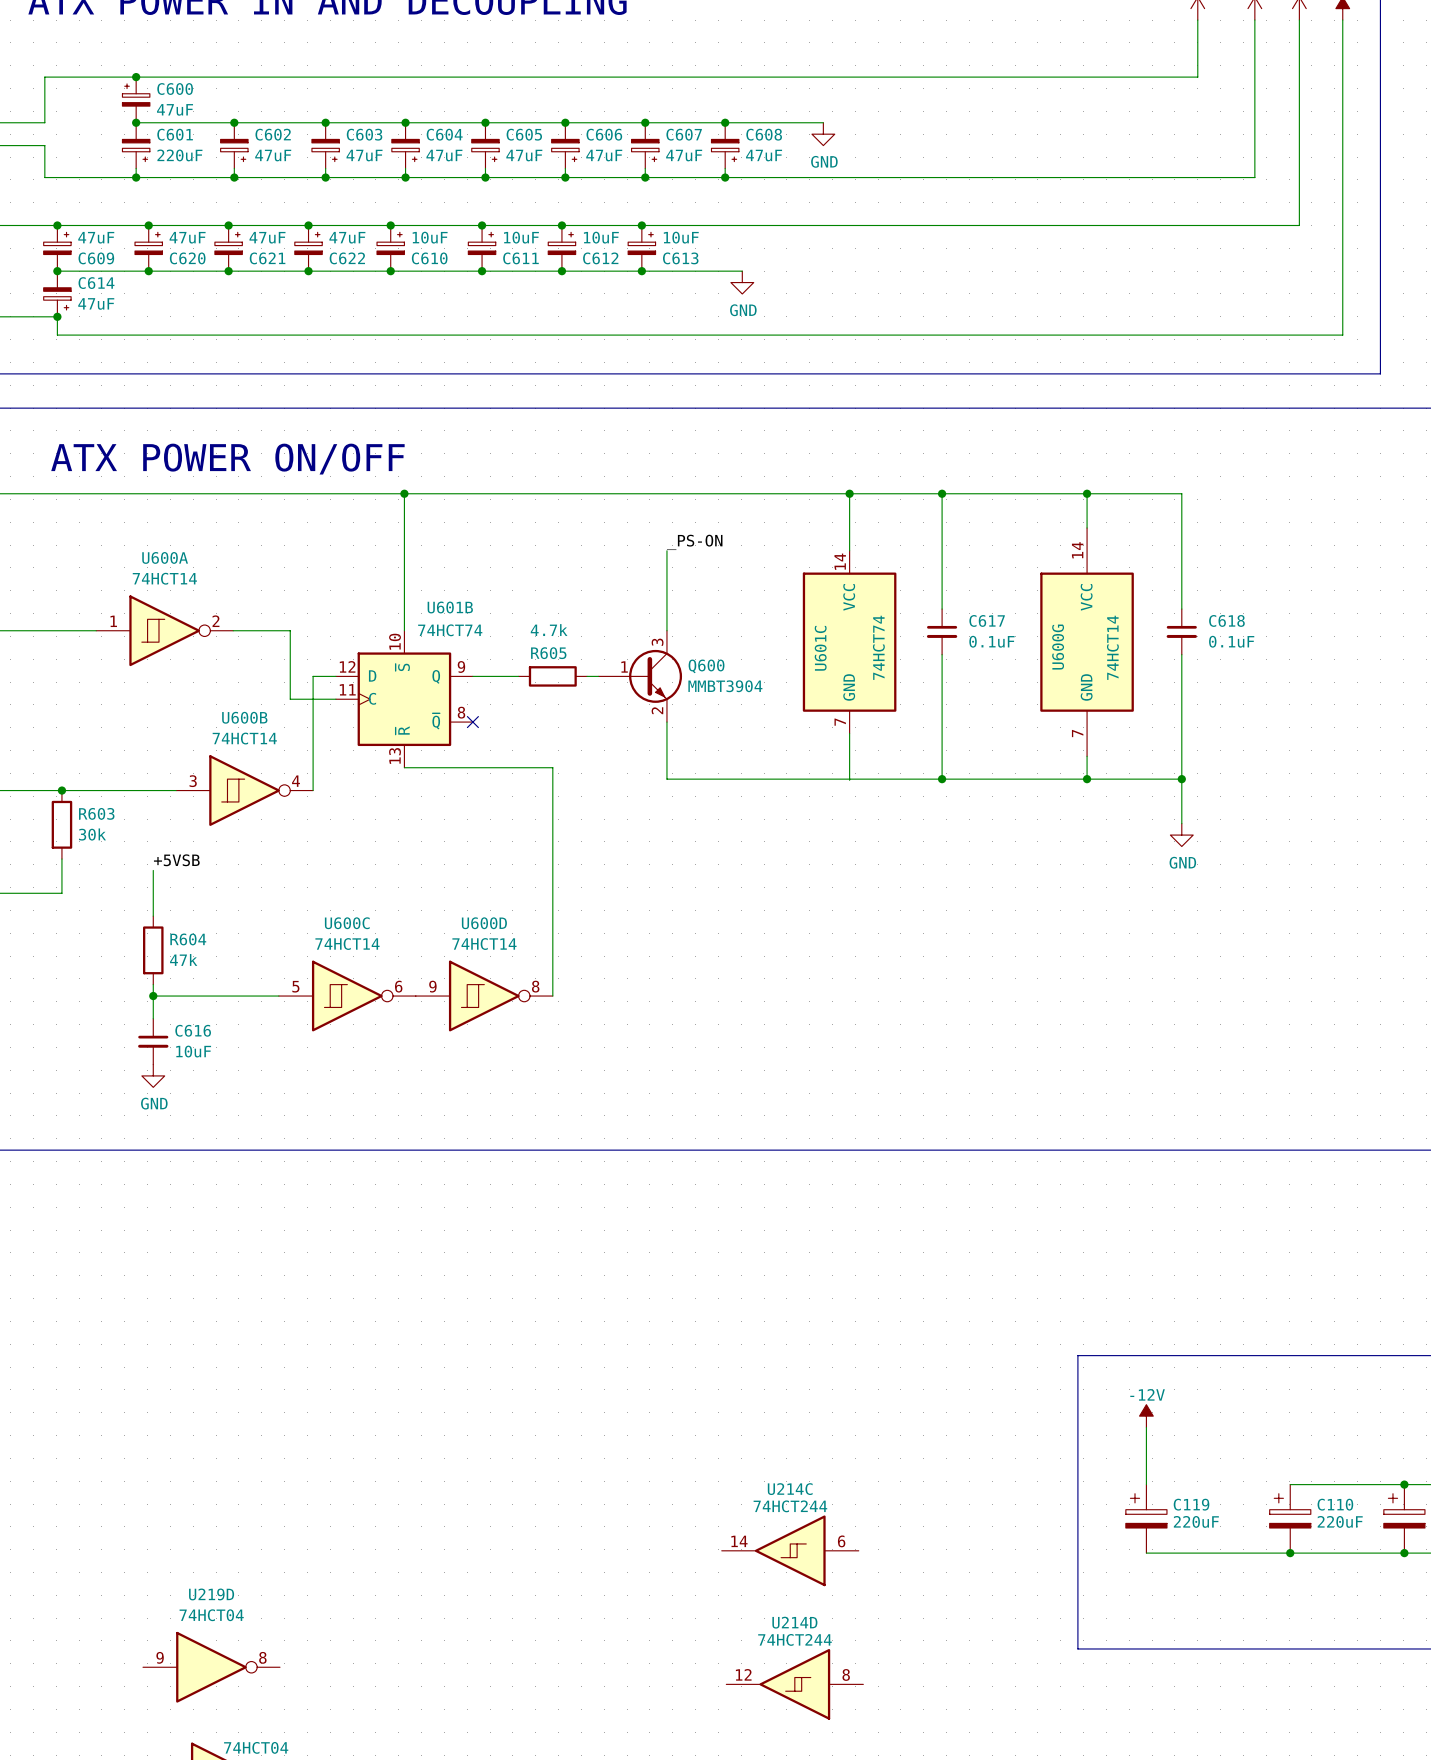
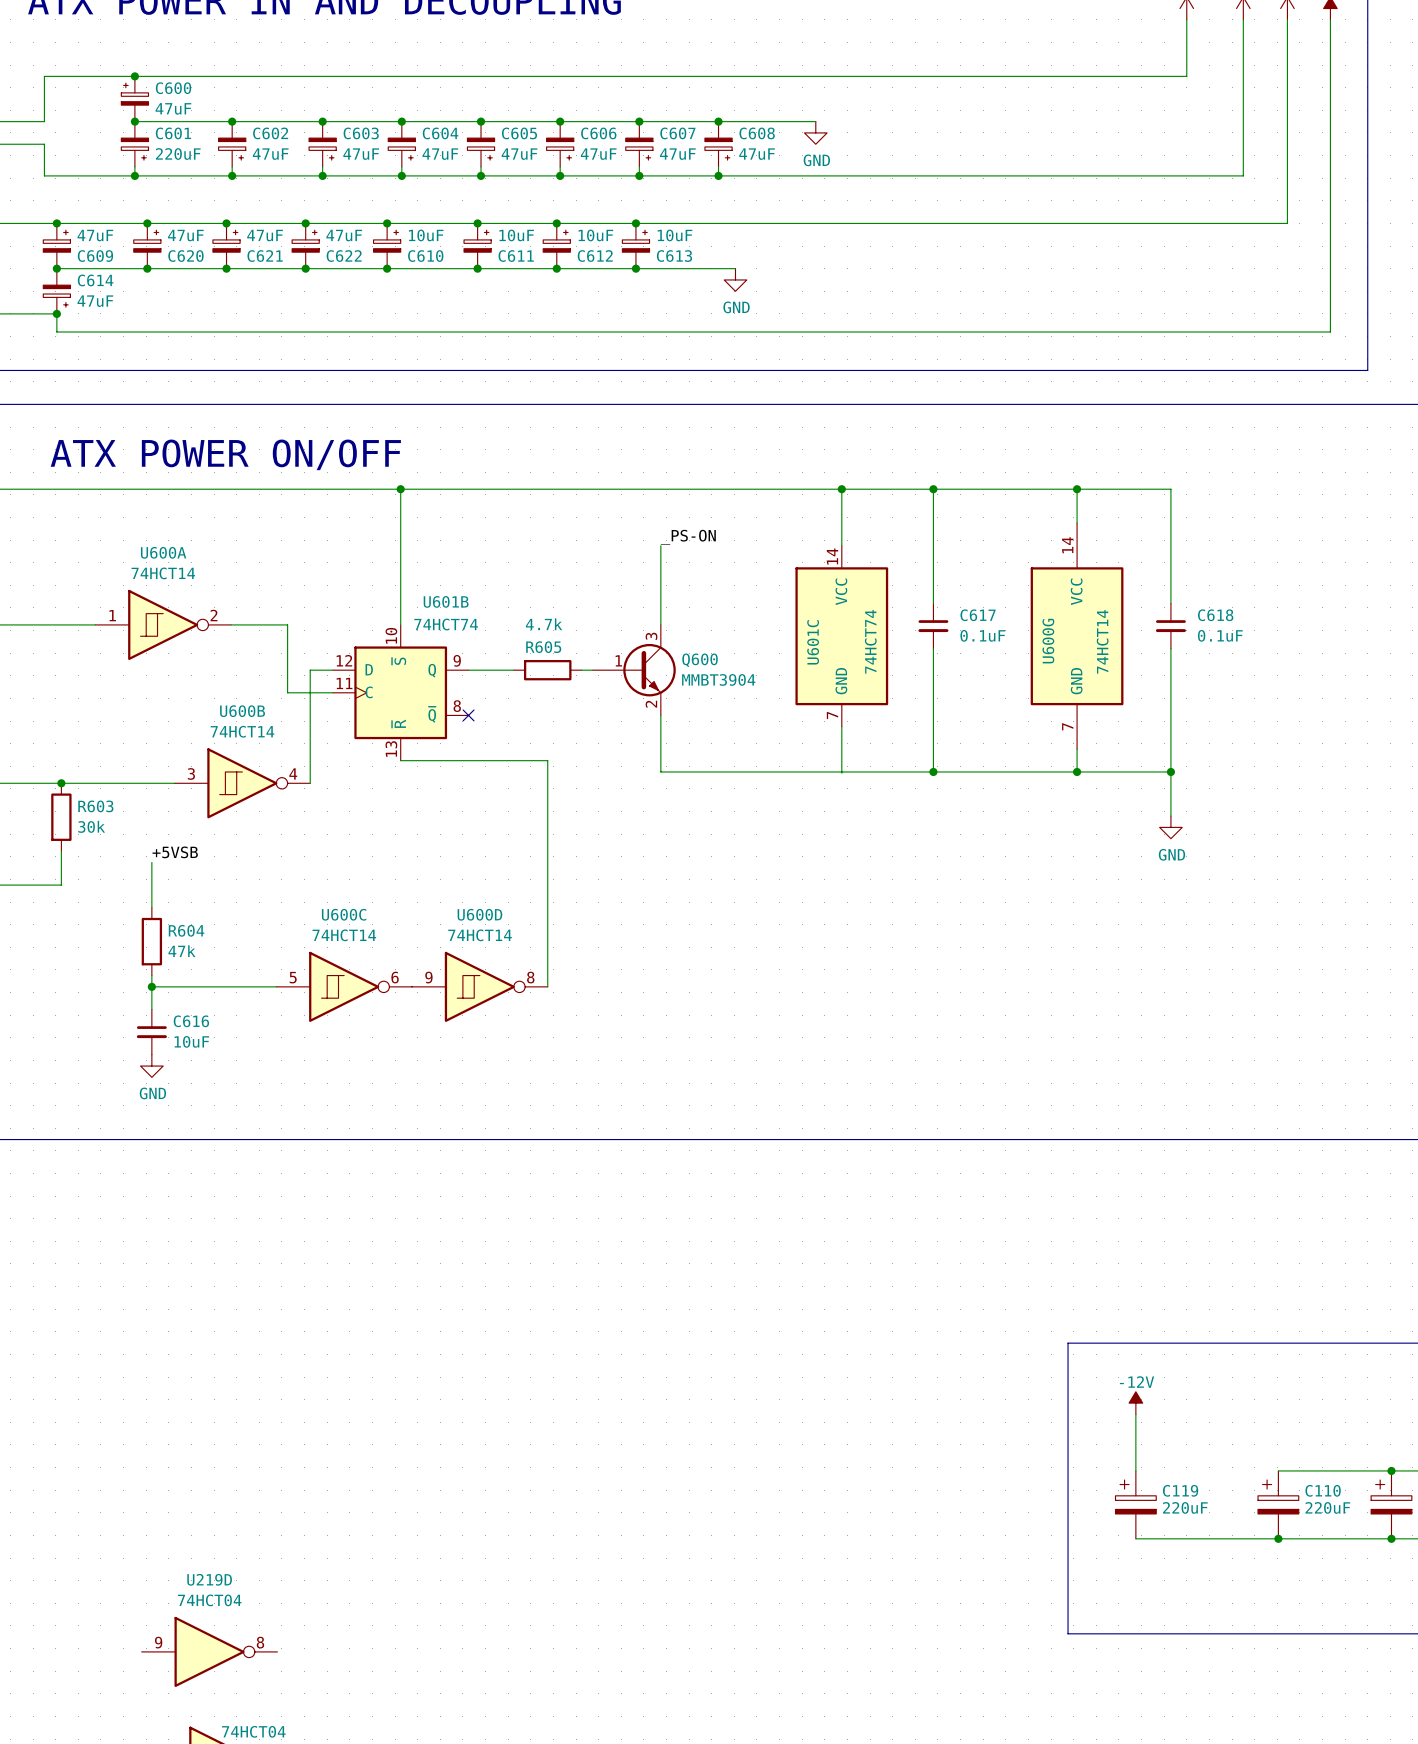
U214C: 74HCT244 (790, 1550) -> none
U214D: 74HCT244 (794, 1684) -> none

